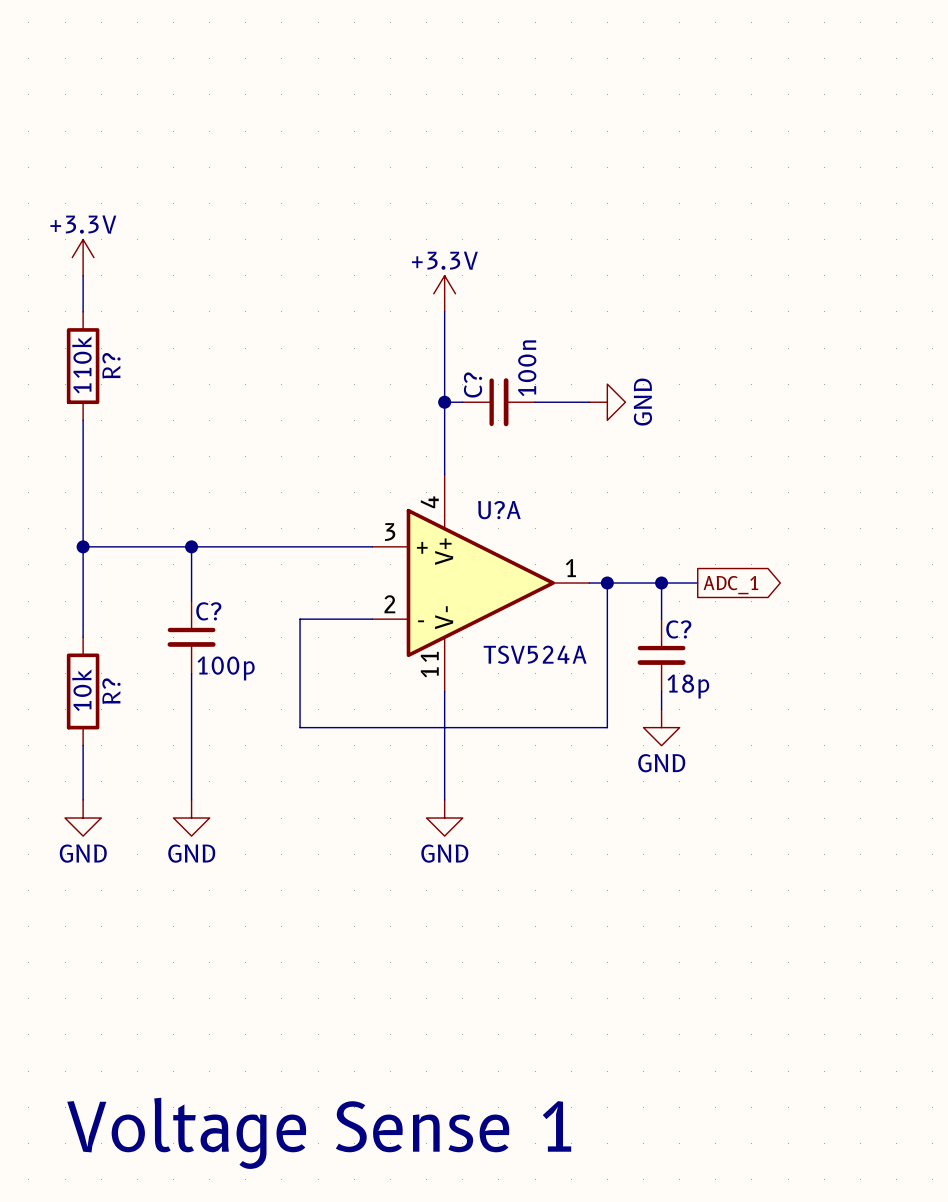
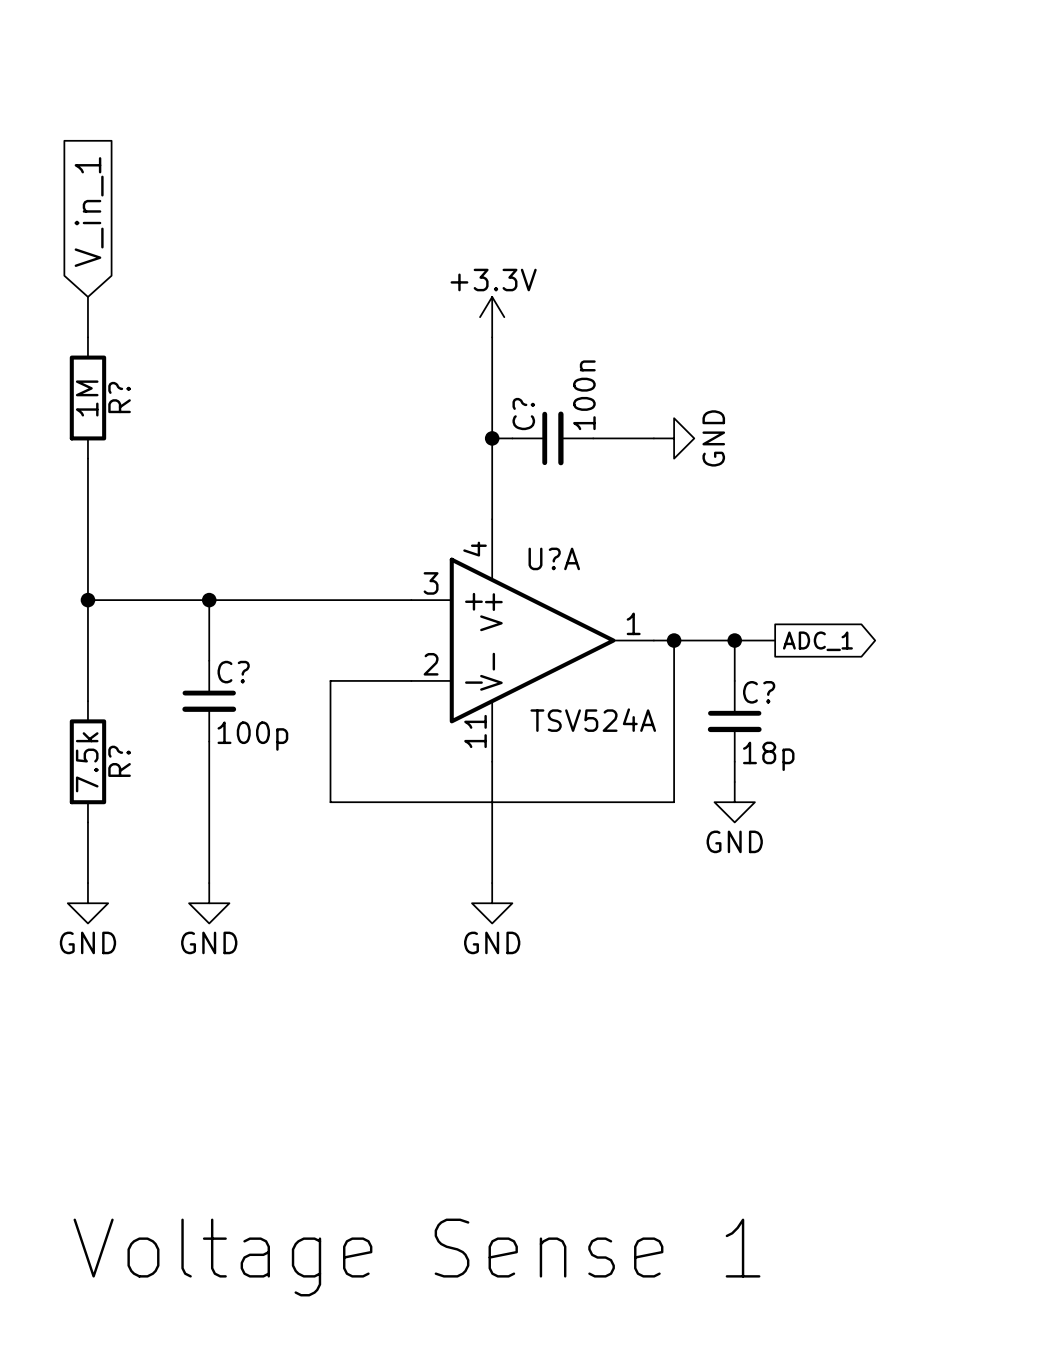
global label: none -> V_in_1 (89, 212)
power symbol: +3.3V (83, 257) -> none
R? value: 110k (81, 364) -> 1M (87, 398)
R? value: 10k (81, 690) -> 7.5k (87, 762)

